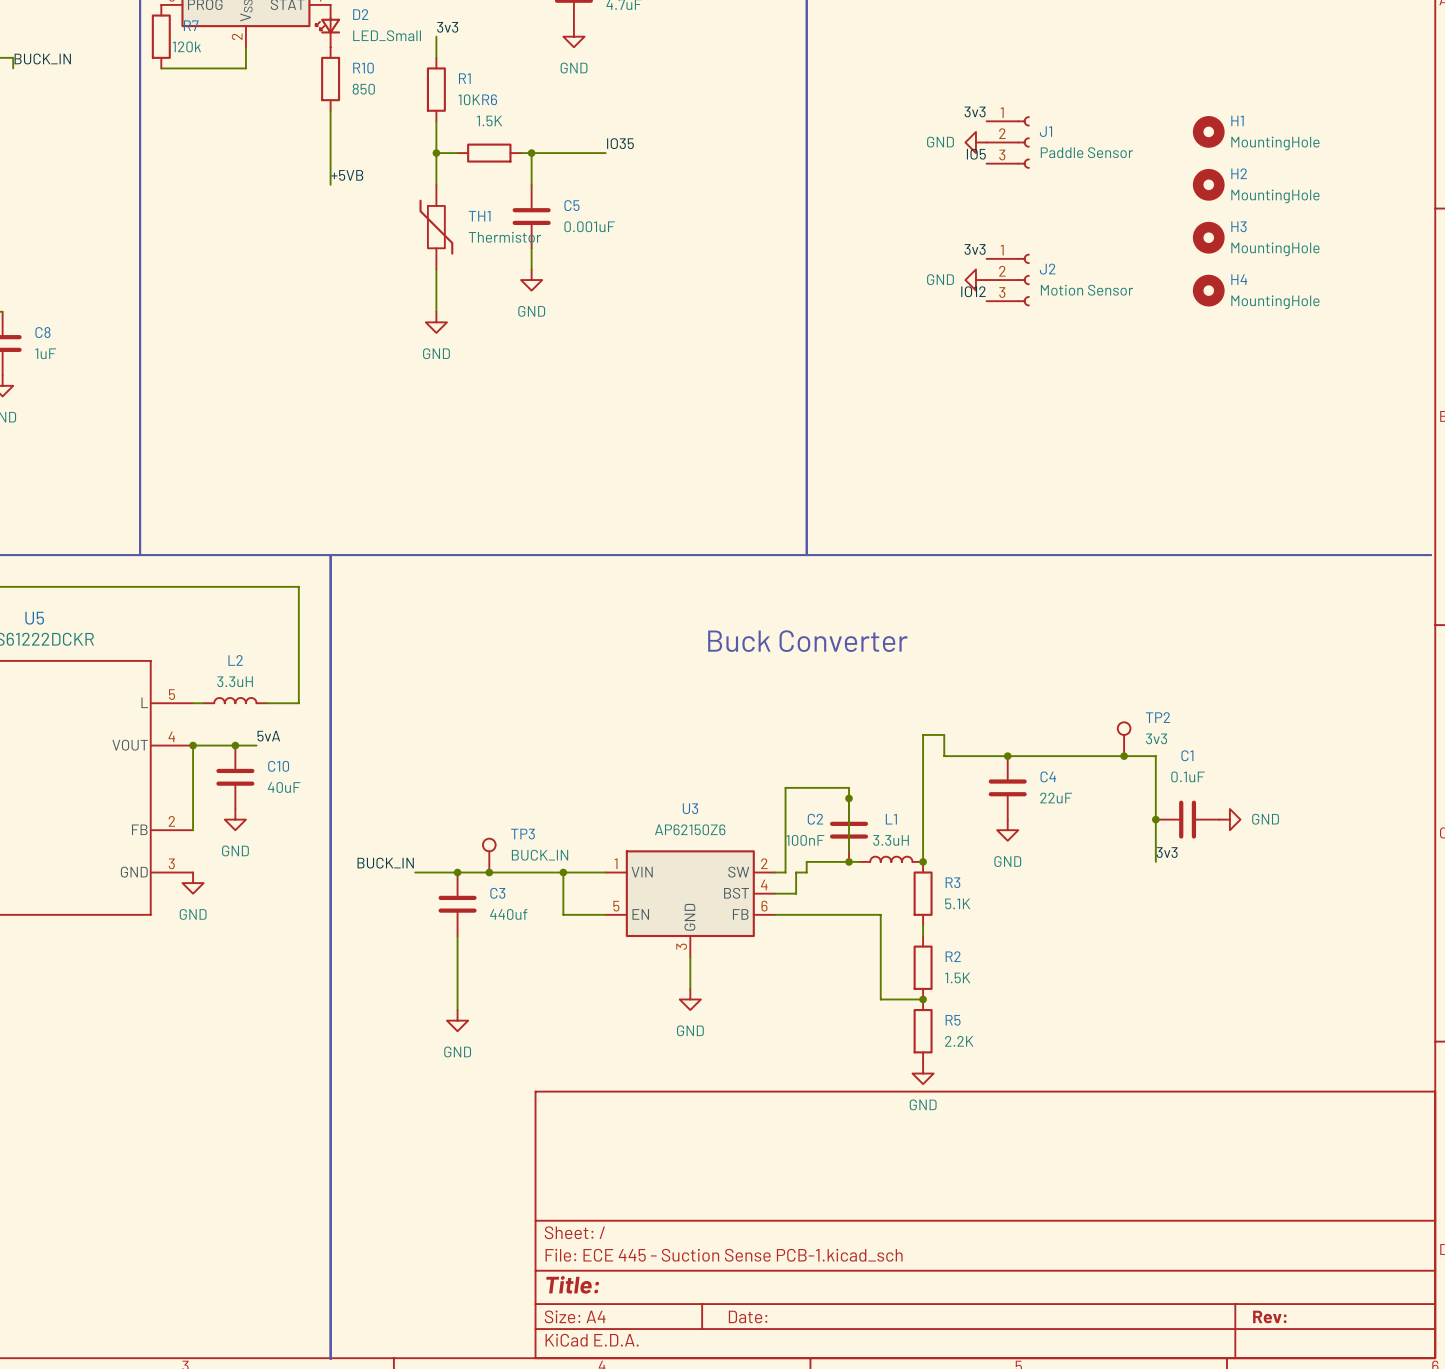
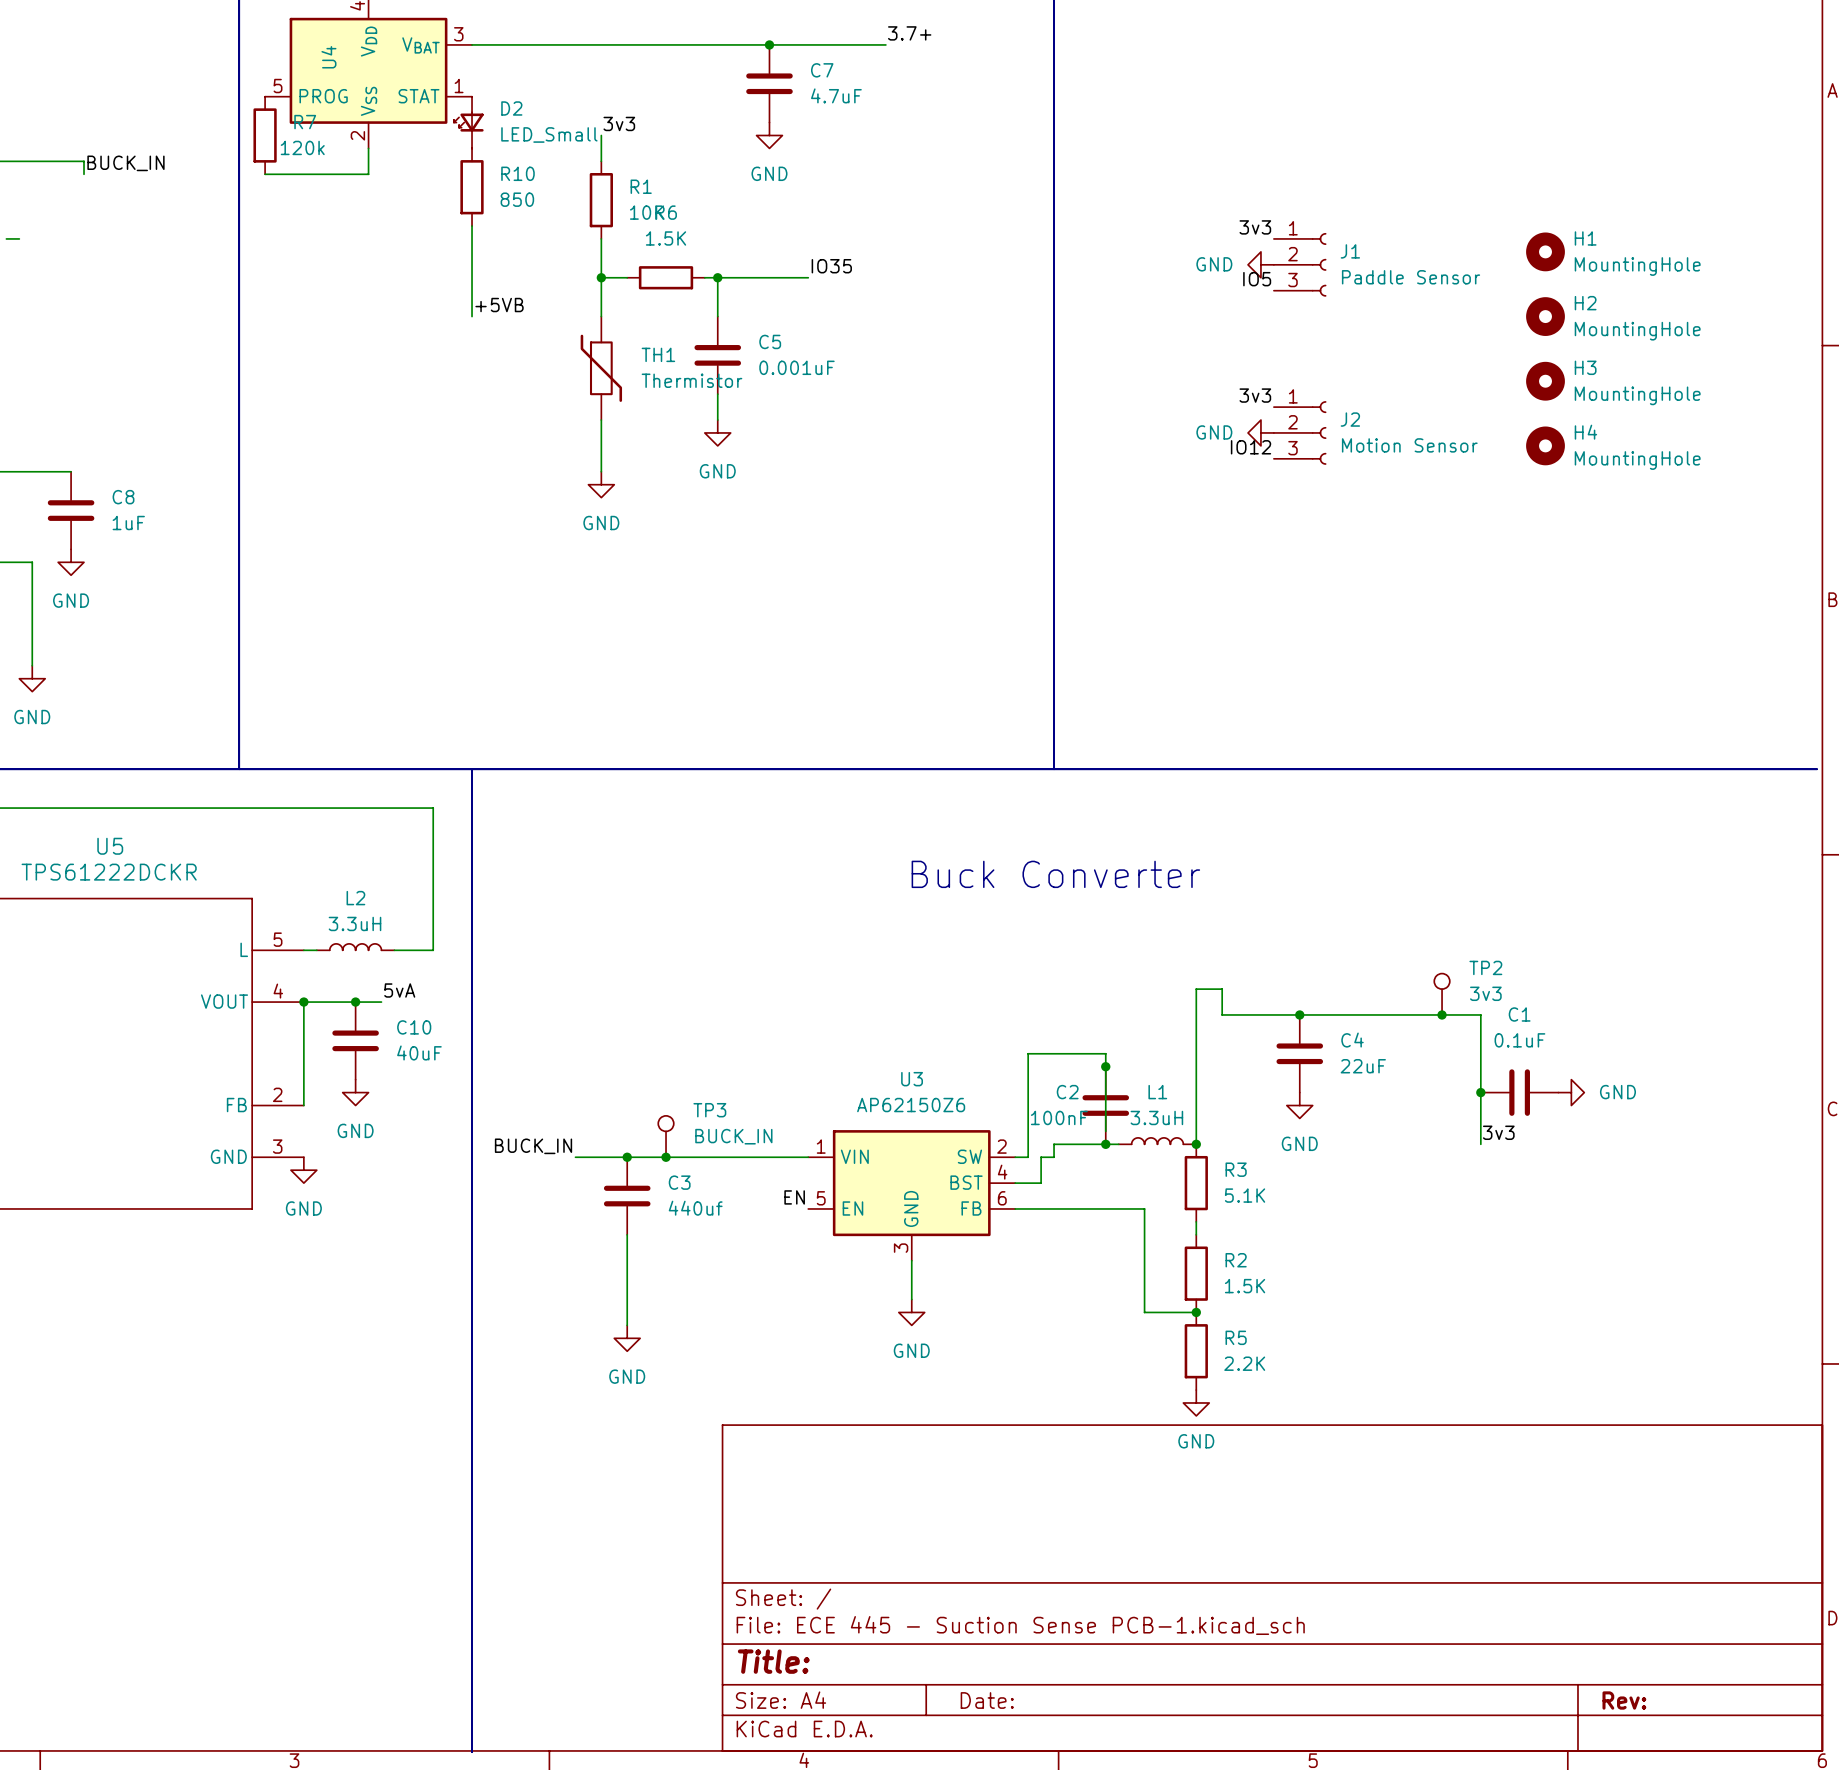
wire: (563, 872) (563, 914) (605, 914) -> none
junction: (563, 872) -> none
label: none -> EN (794, 1197)

